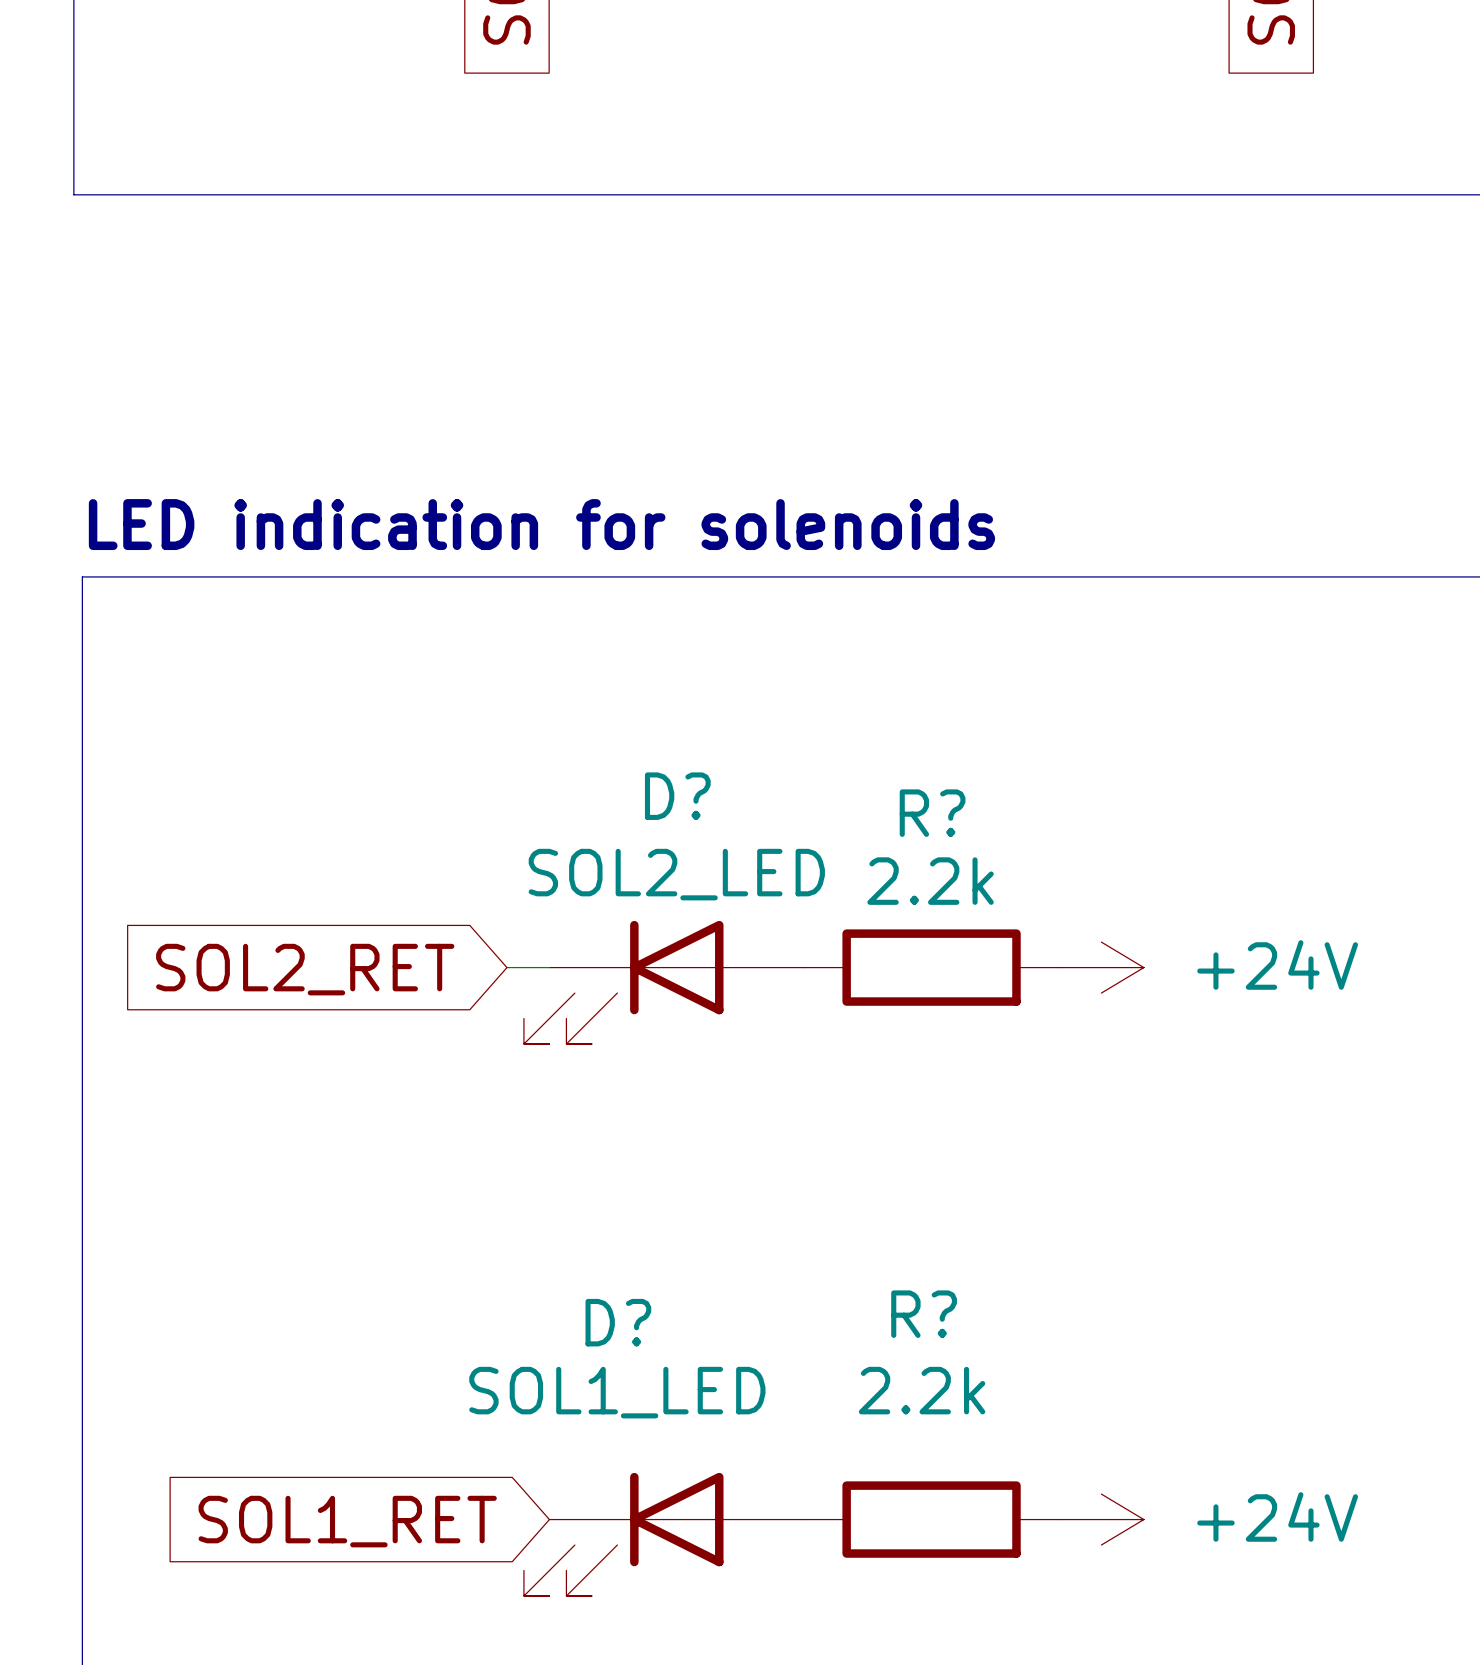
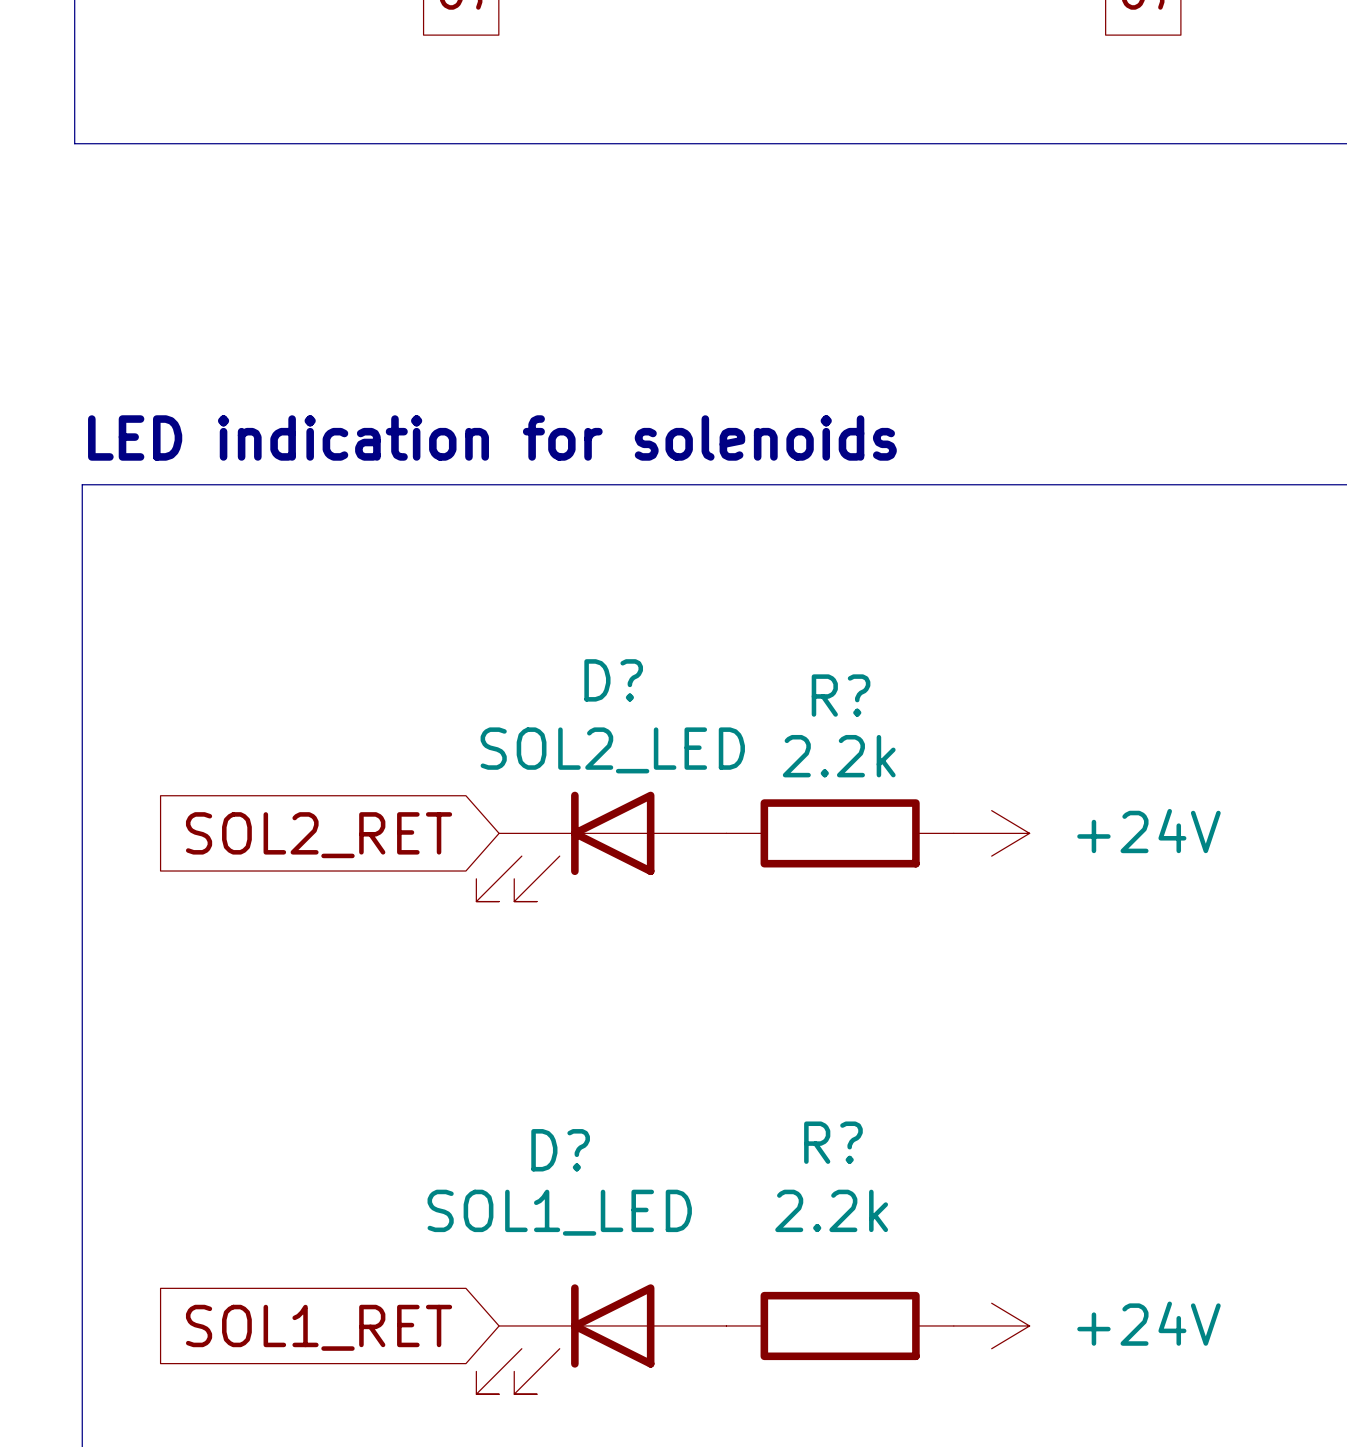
wire: (506, 967) (549, 967) -> none
global label position: SOL2_RET (305, 969) -> SOL2_RET (319, 835)

